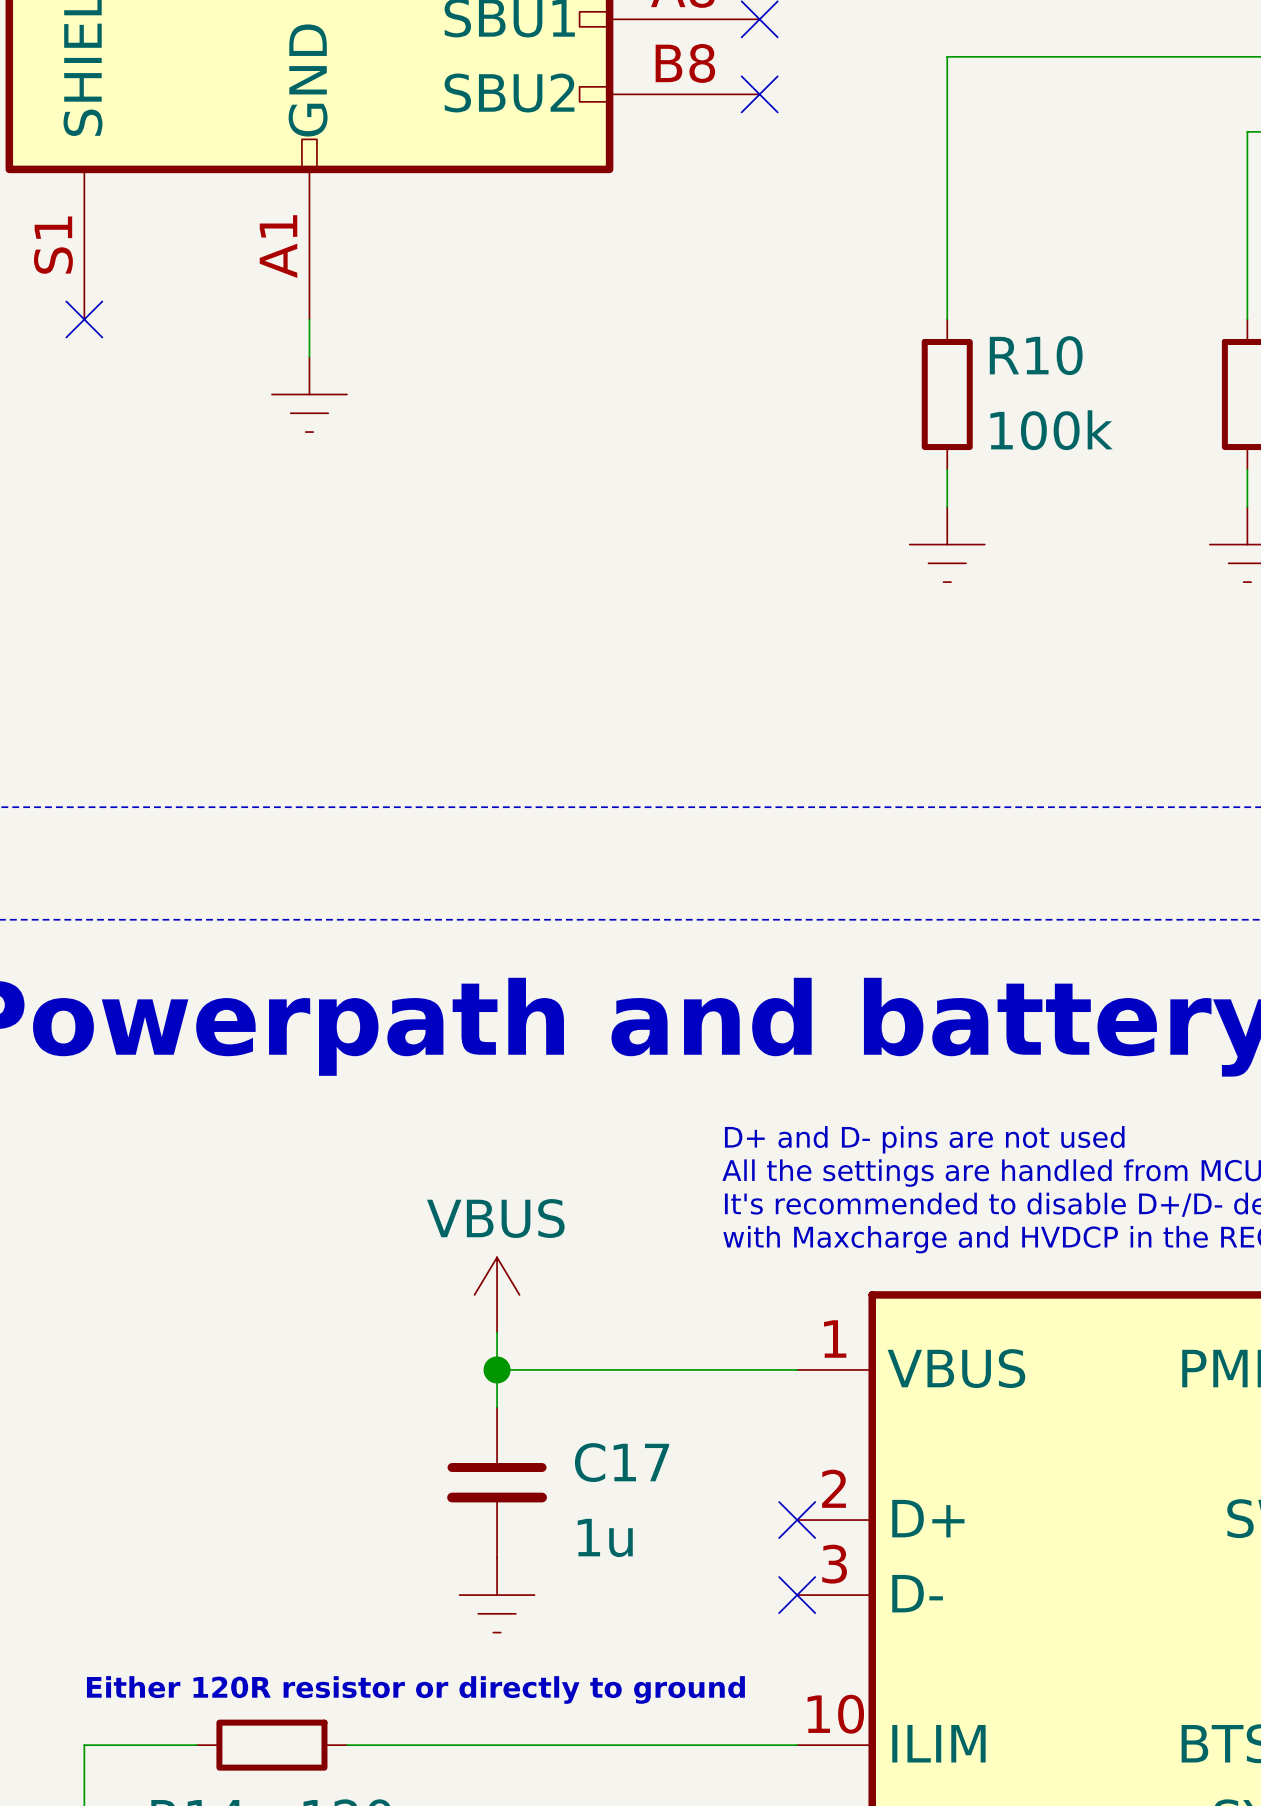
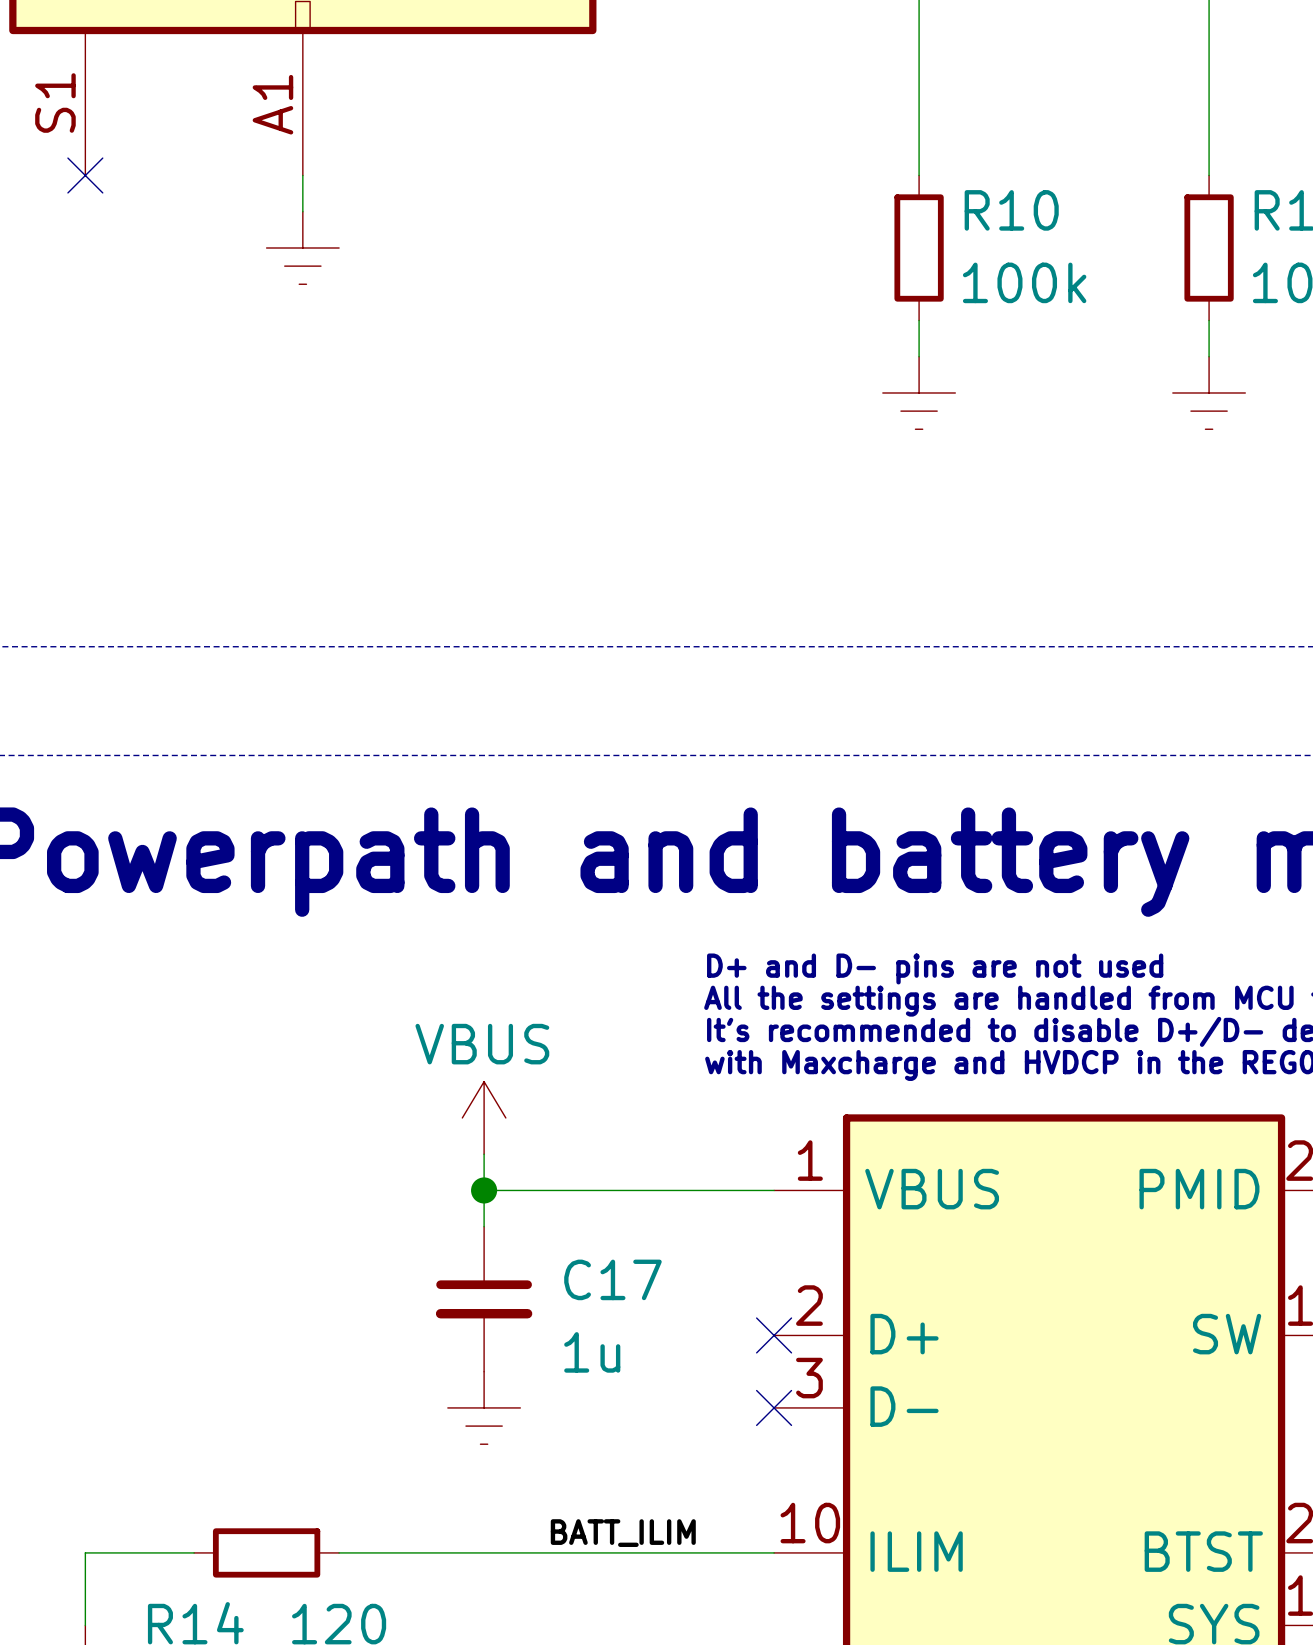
text: Either 120R resistor or directly to ground (415, 1689) -> none
label: none -> BATT_ILIM (623, 1533)

